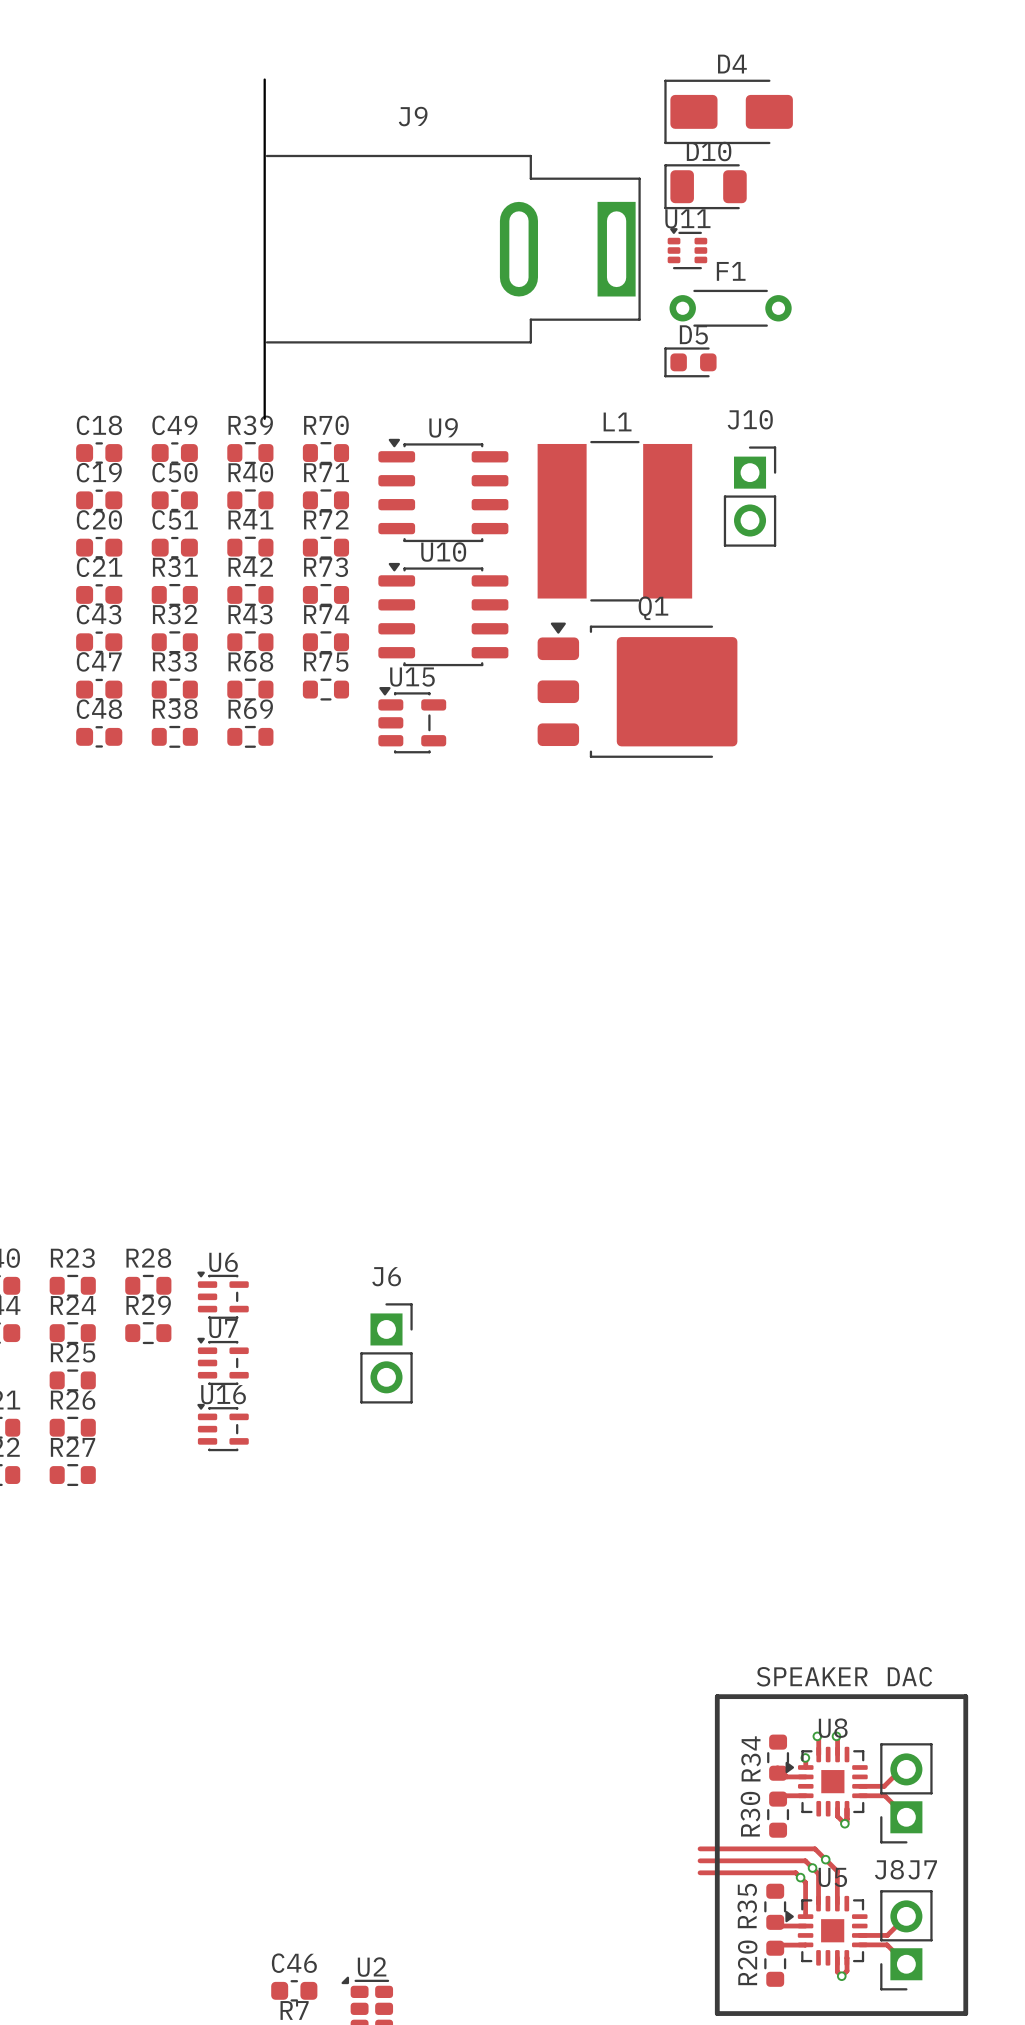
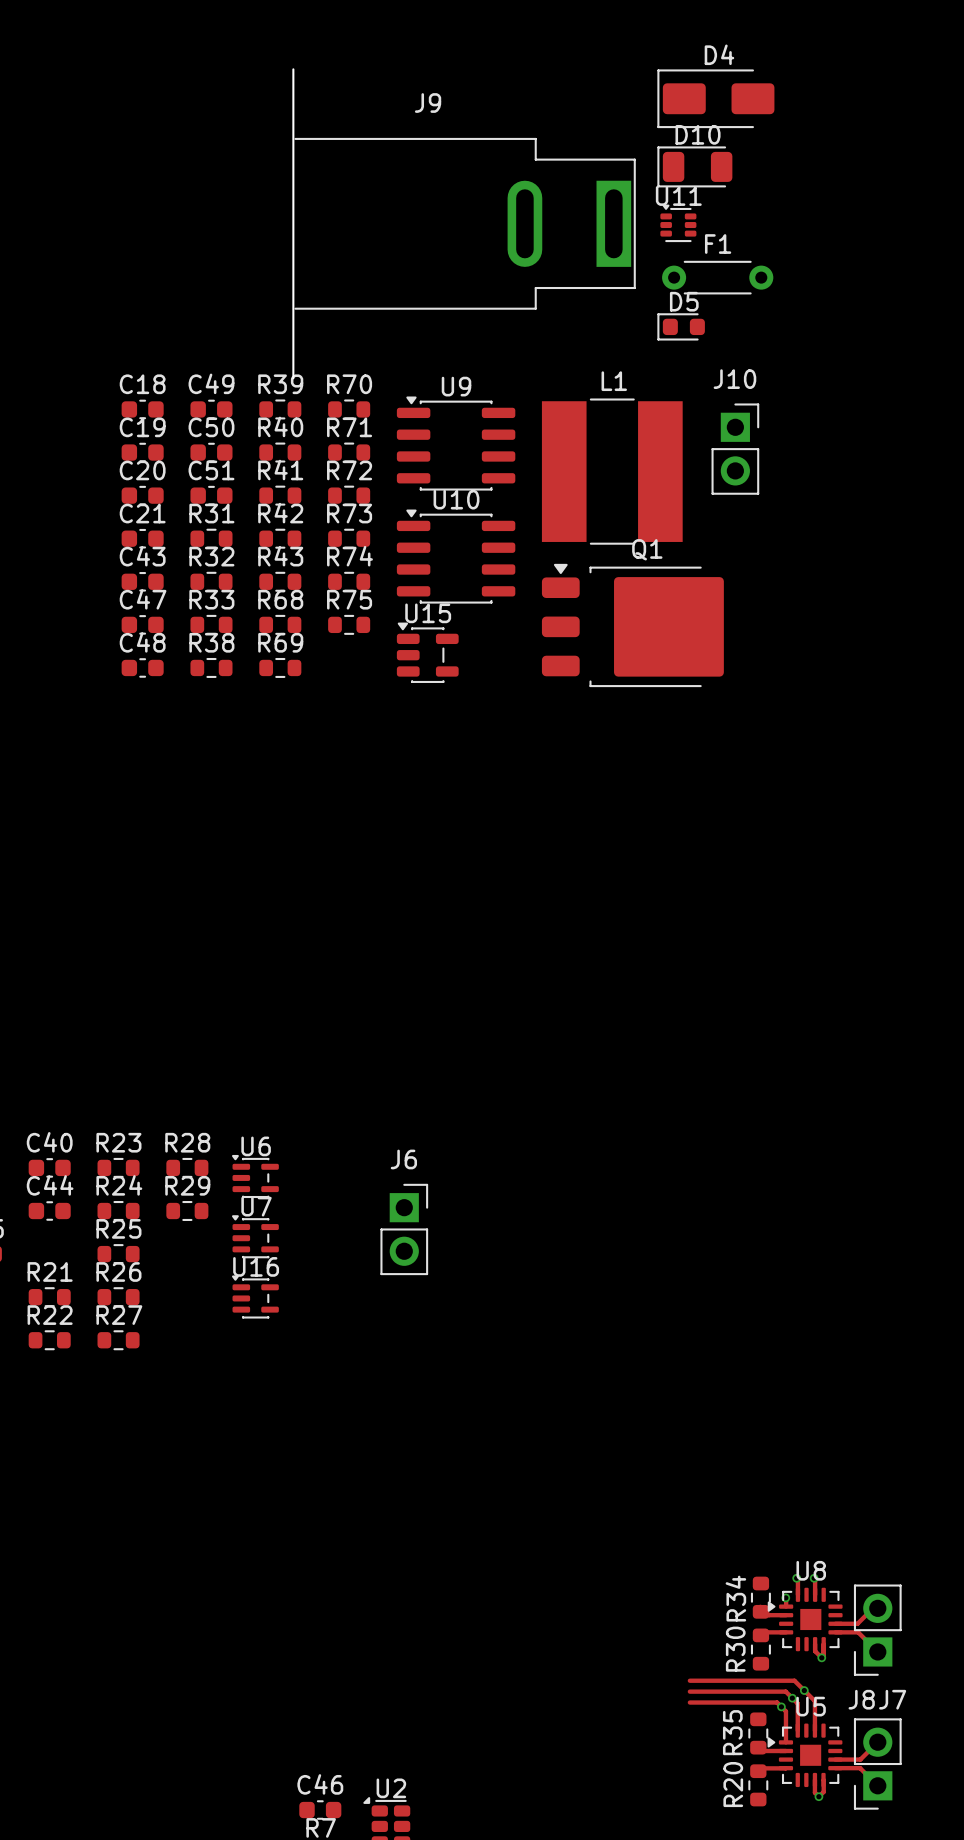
text: SPEAKER DAC (844, 1676) -> none
line: (717, 1696) (965, 1696) (965, 2013) (717, 2013) (717, 1696) -> none

